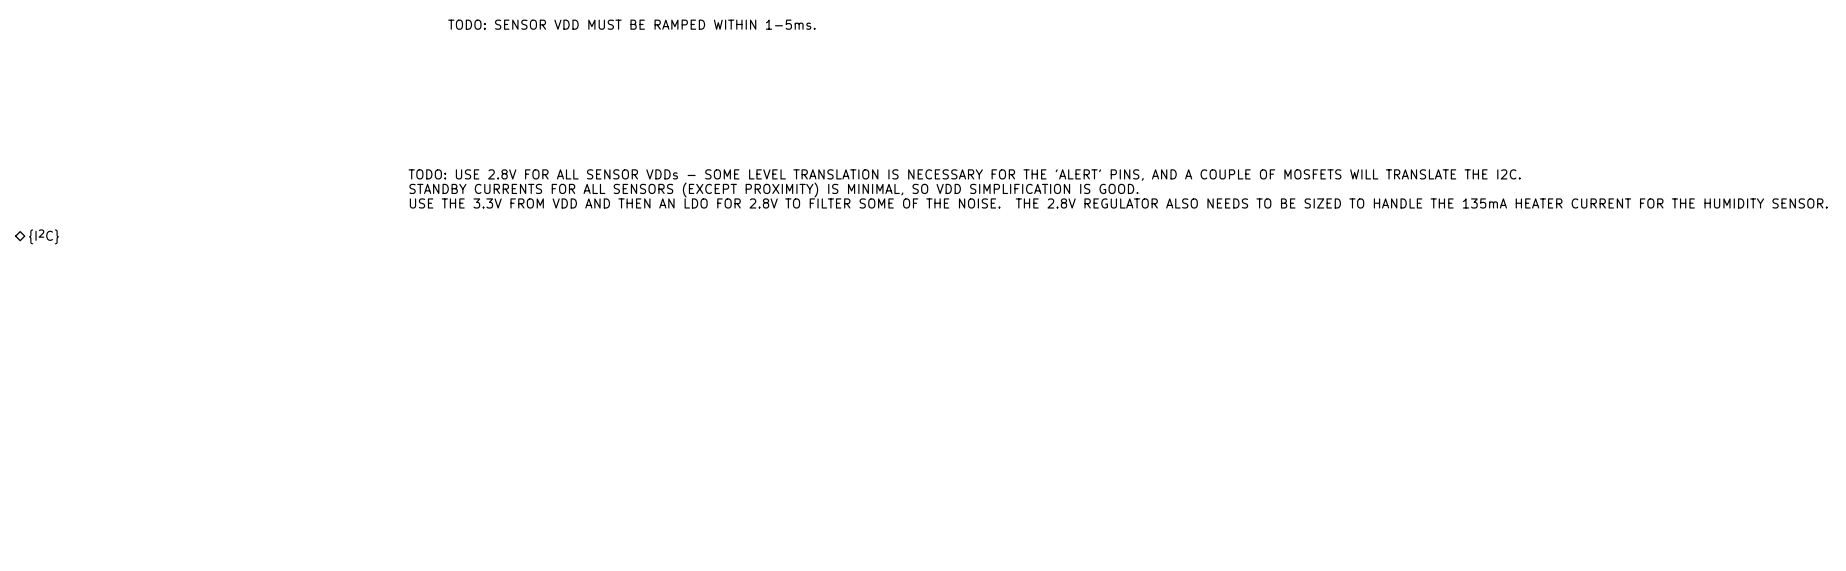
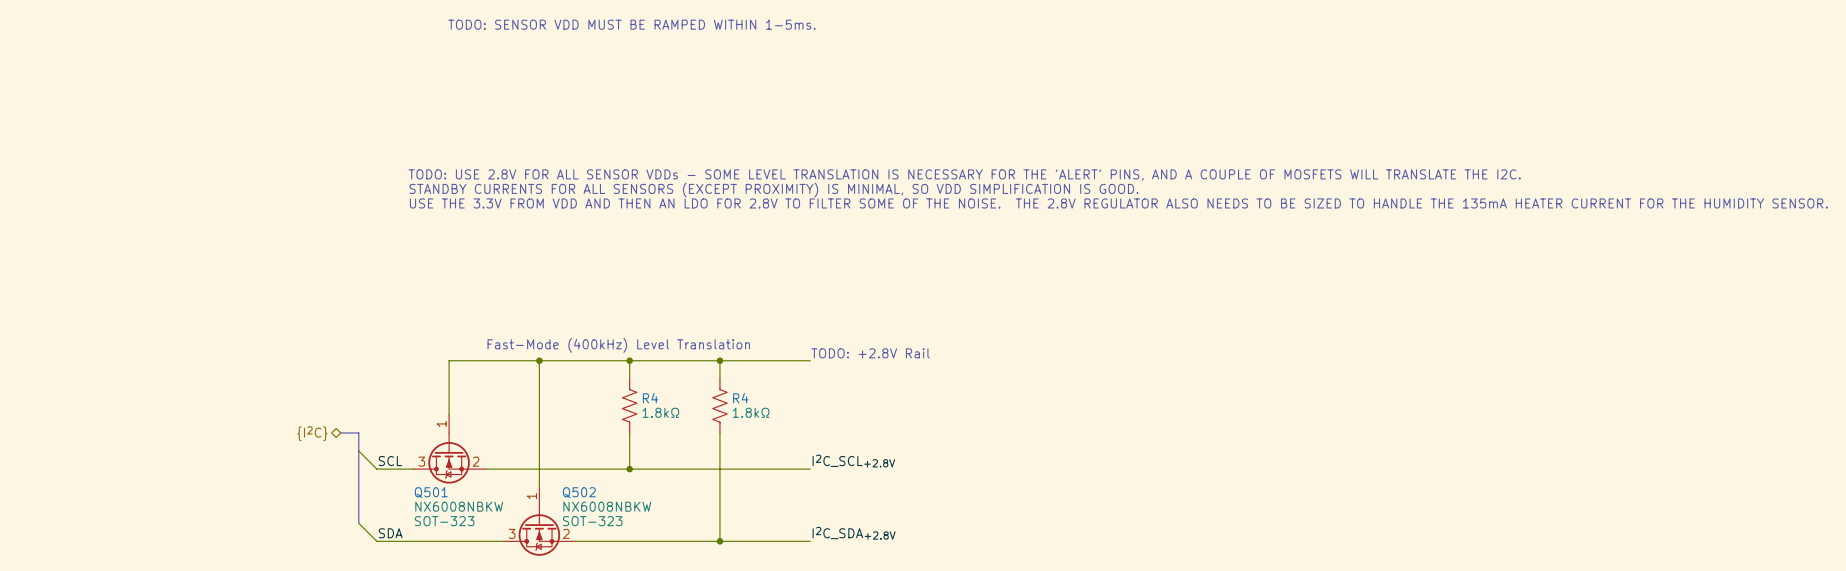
hierarchical label: {I2C} (43, 236) -> none
text: none -> Fast-Mode (400kHz) Level Translation (618, 345)
text: none -> TODO: +2.8V Rail (870, 353)
wire: none -> (539, 360) (539, 487)
junction: none -> (539, 360)
wire: none -> (629, 360) (629, 378)
junction: none -> (629, 360)
wire: none -> (719, 360) (719, 378)
junction: none -> (719, 360)
wire: none -> (810, 360) (449, 360) (449, 414)
R4: none -> 1.8kΩ (629, 405)
R4: none -> 1.8kΩ (719, 405)
bus: none -> (340, 432) (358, 432) (358, 523)
wire: none -> (629, 432) (629, 469)
wire: none -> (719, 432) (719, 541)
hierarchical label: none -> {I2C} (312, 433)
Q501: none -> NX6008NBKW (449, 449)
wire: none -> (358, 451) (376, 469) (412, 469)
label: none -> SCL (390, 461)
label: none -> I2C_SCL+2.8V (853, 461)
wire: none -> (485, 469) (810, 469)
junction: none -> (629, 469)
Q502: none -> NX6008NBKW (539, 521)
wire: none -> (358, 523) (376, 541) (503, 541)
label: none -> SDA (390, 533)
label: none -> I2C_SDA+2.8V (854, 533)
wire: none -> (575, 541) (810, 541)
junction: none -> (719, 541)

